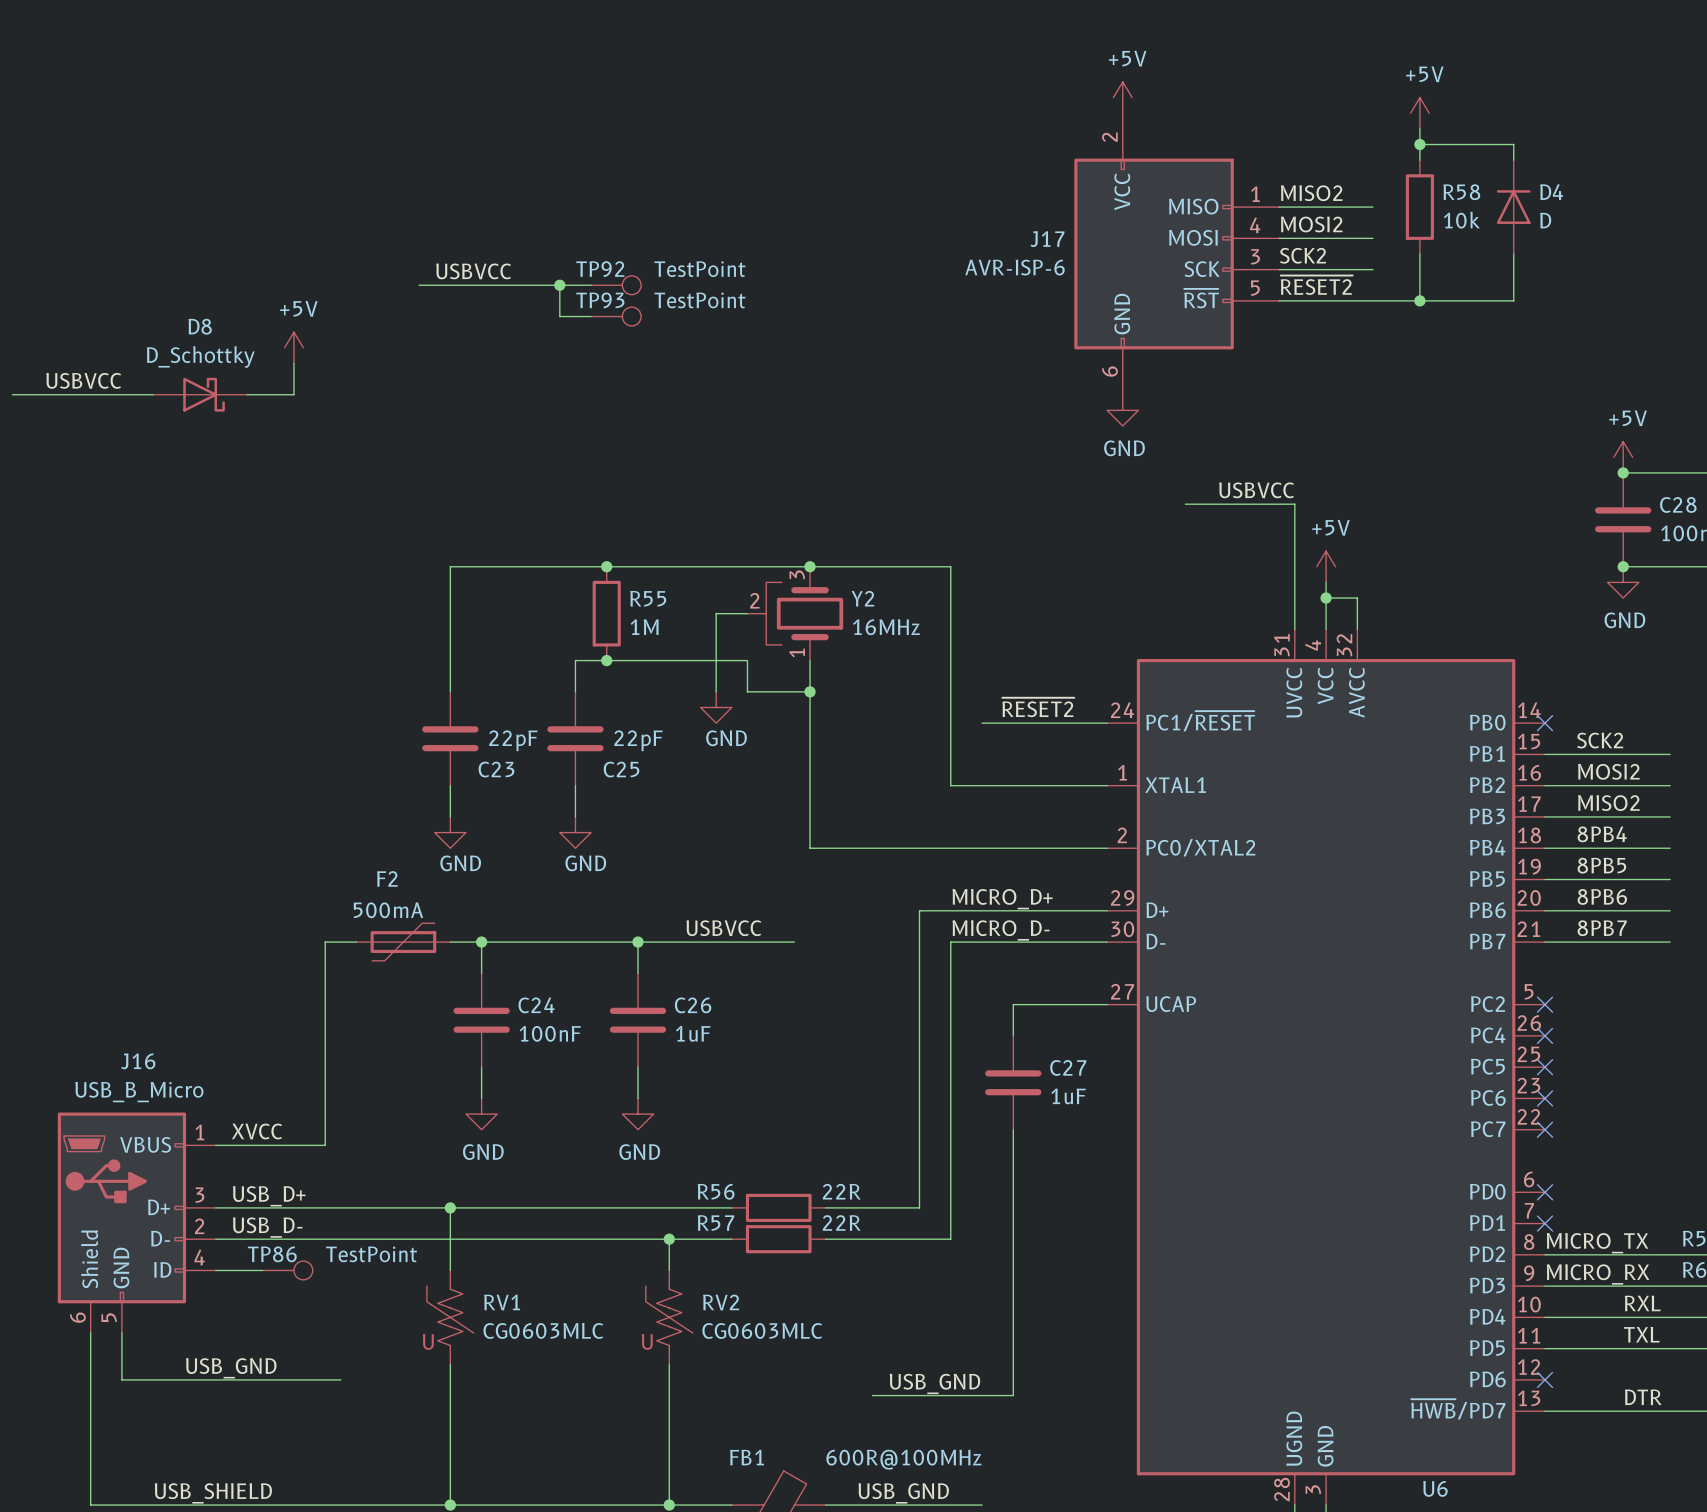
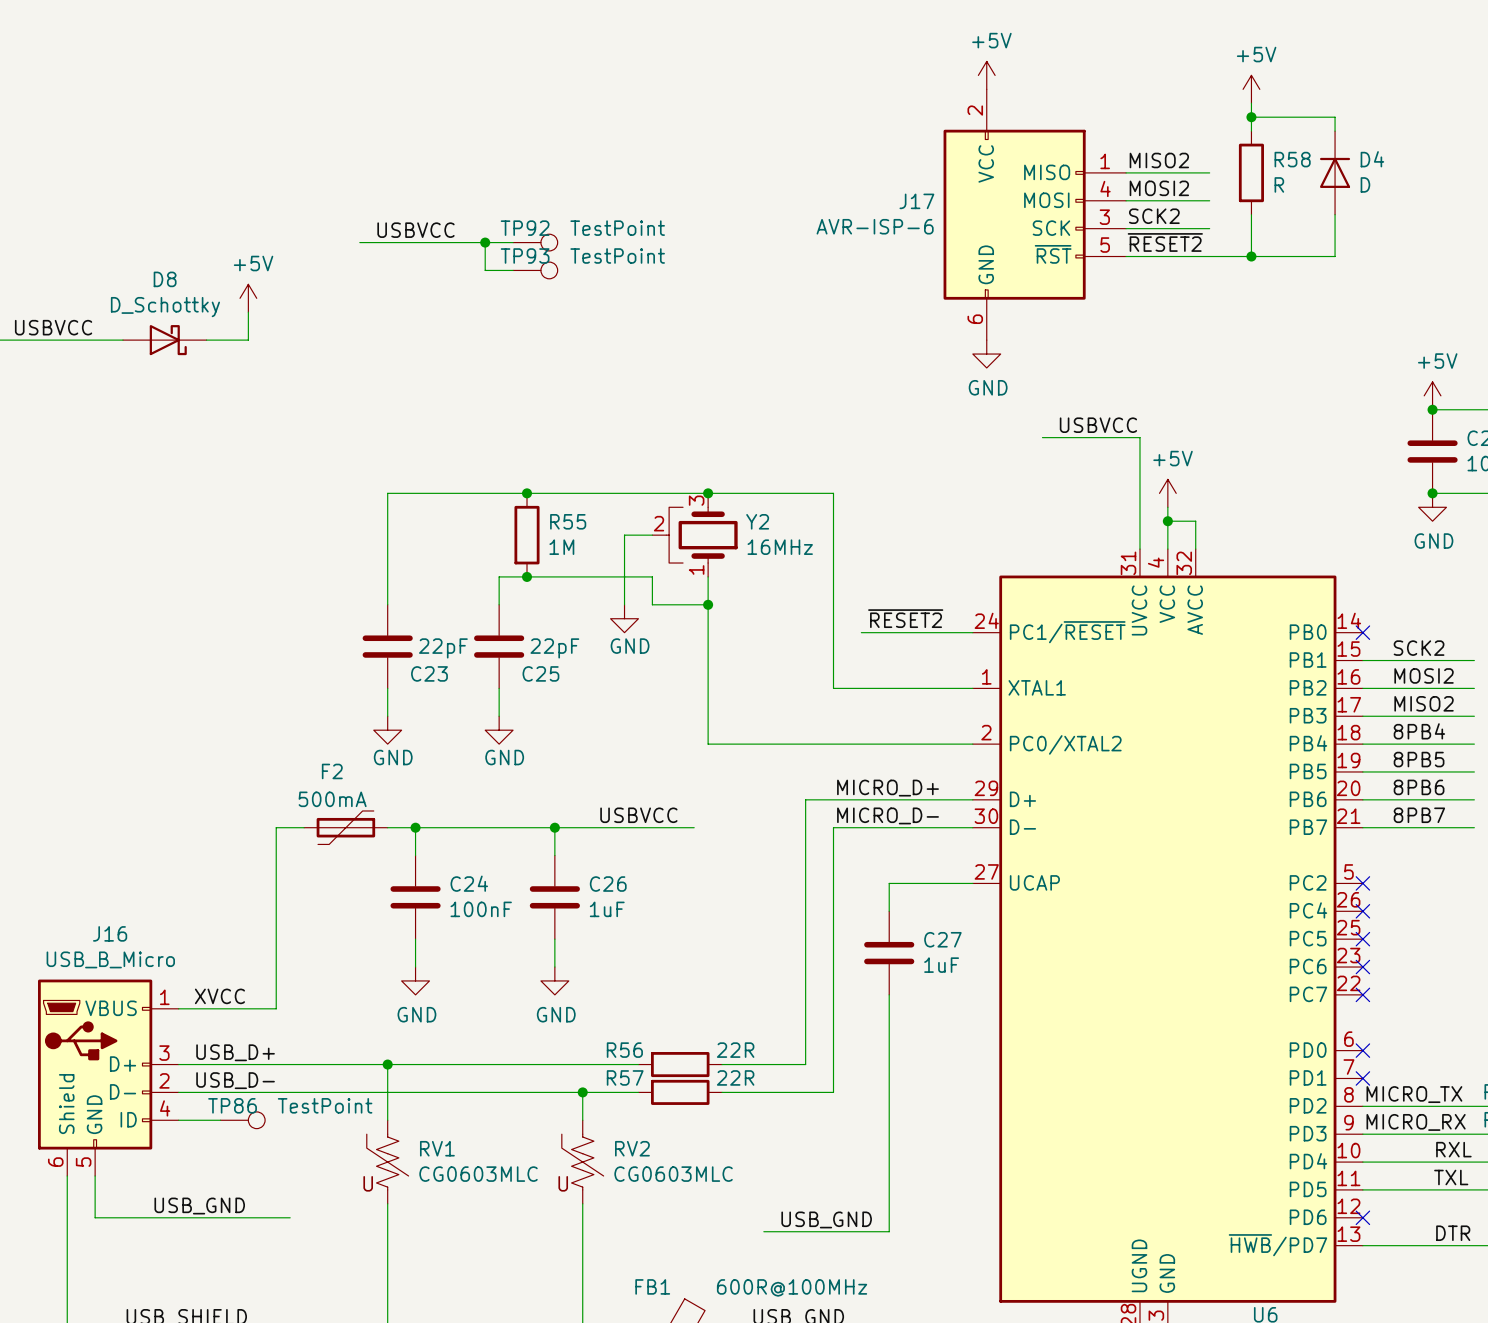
R58 value: 10k (1461, 220) -> R (1279, 184)

